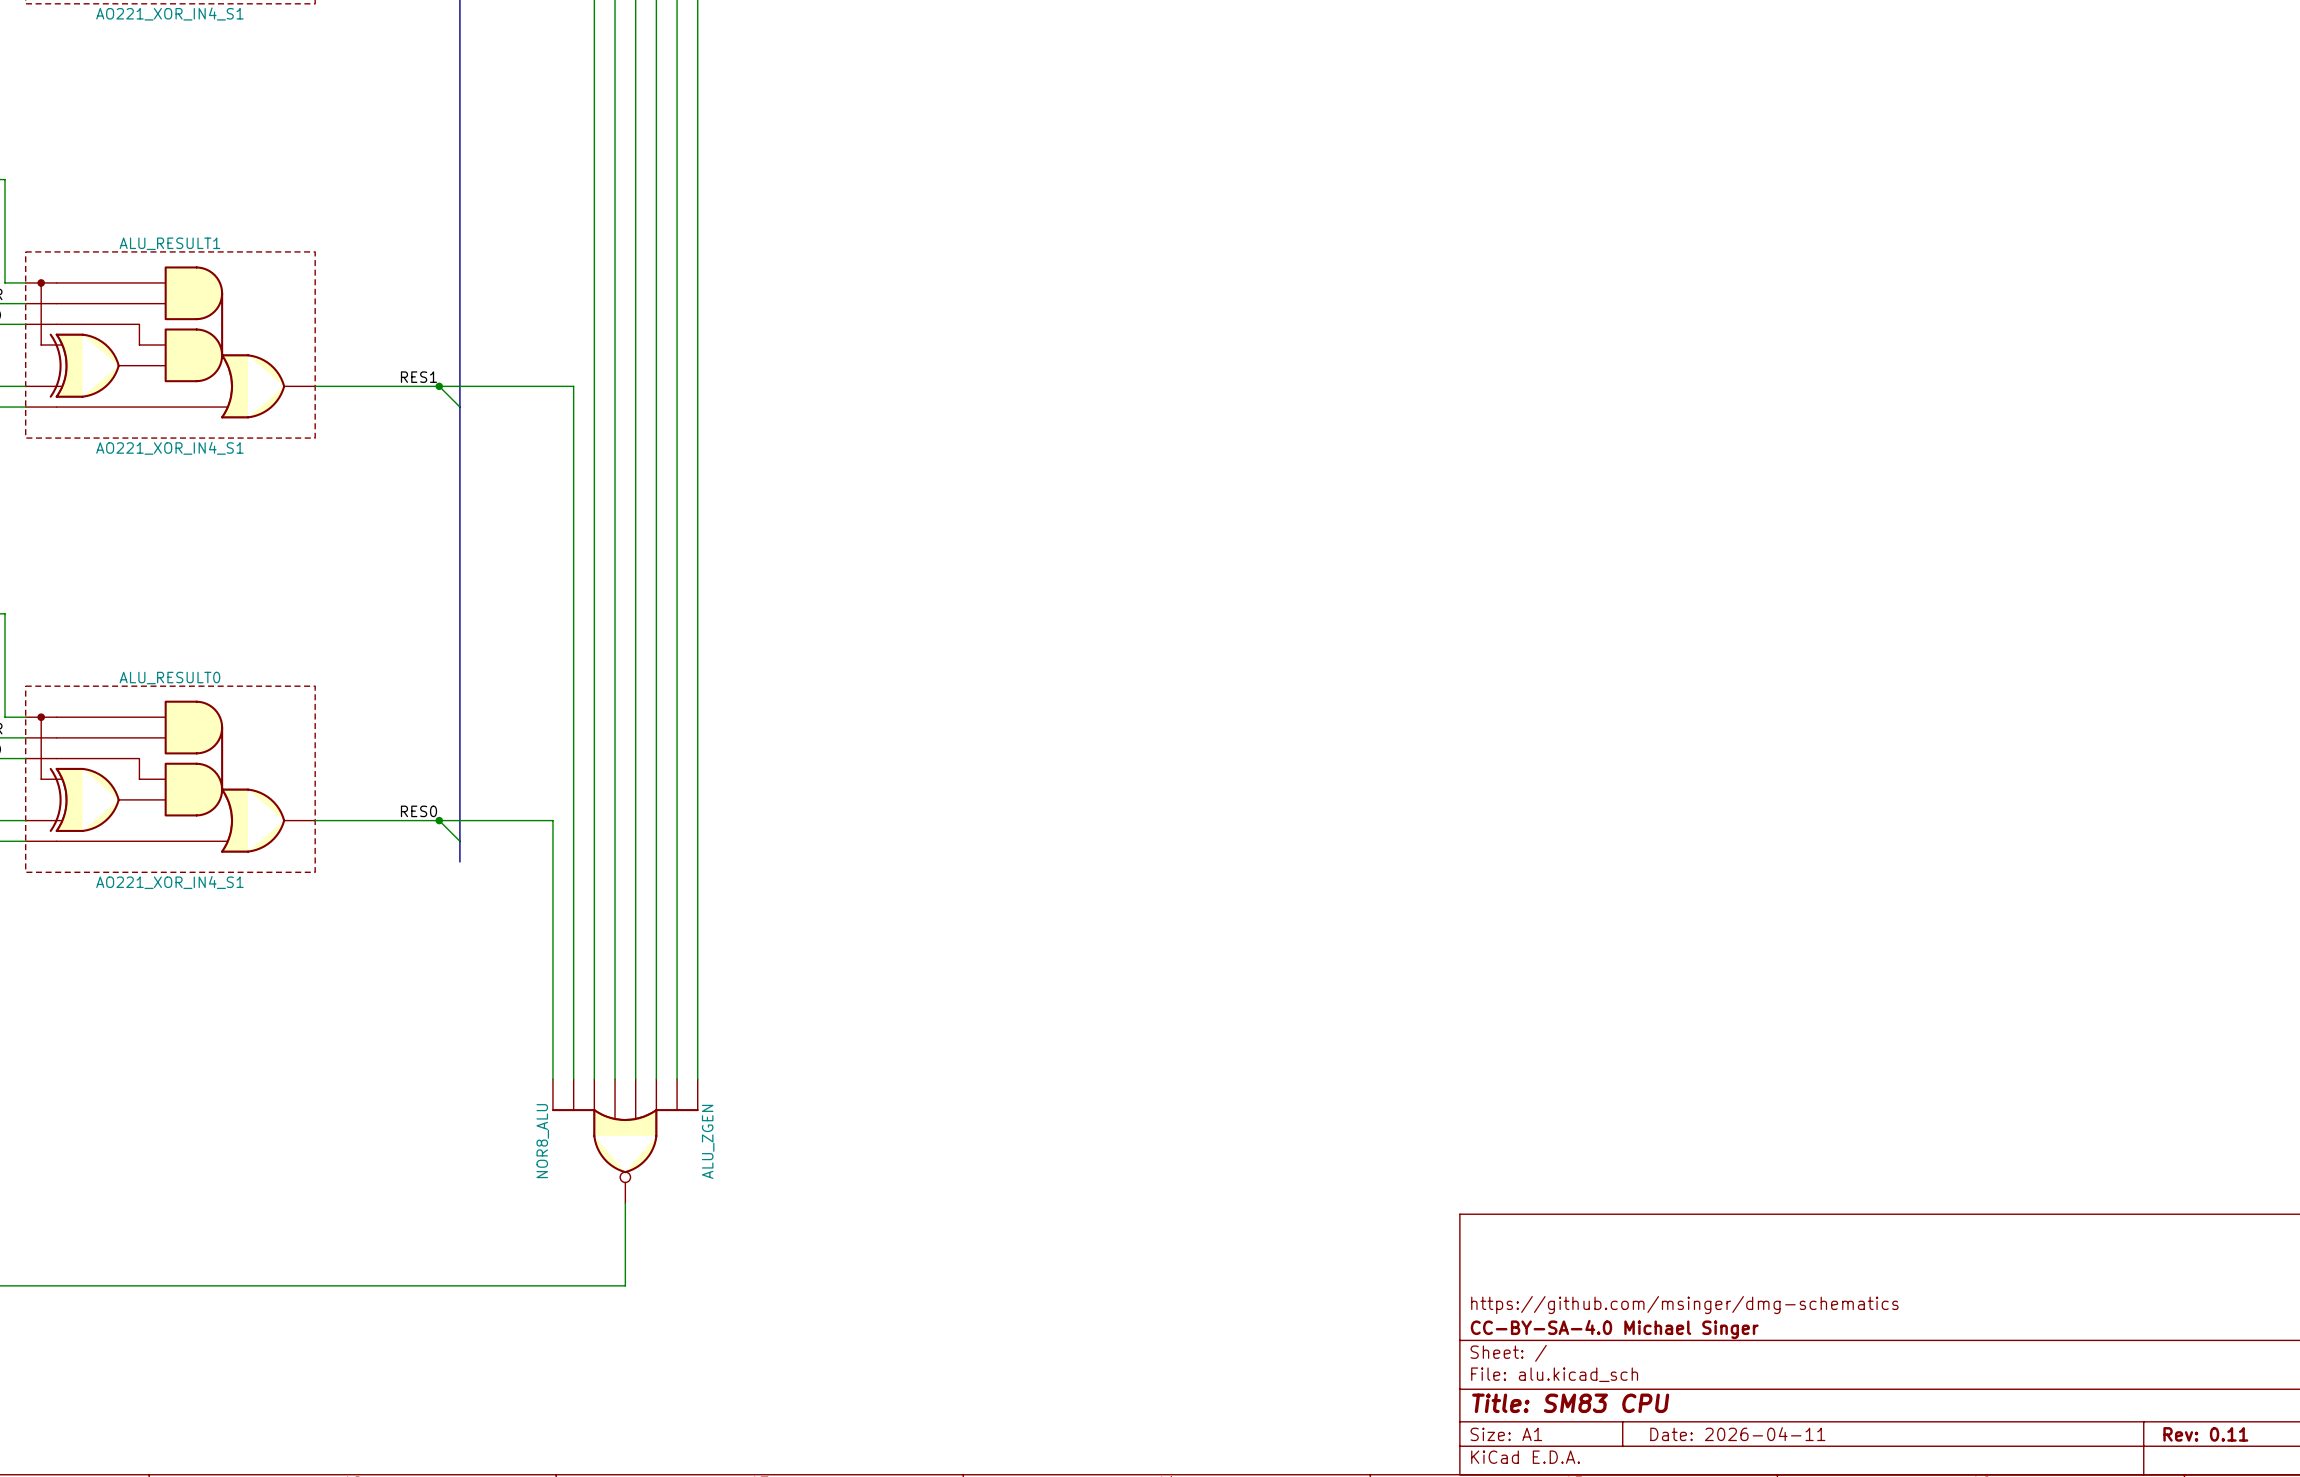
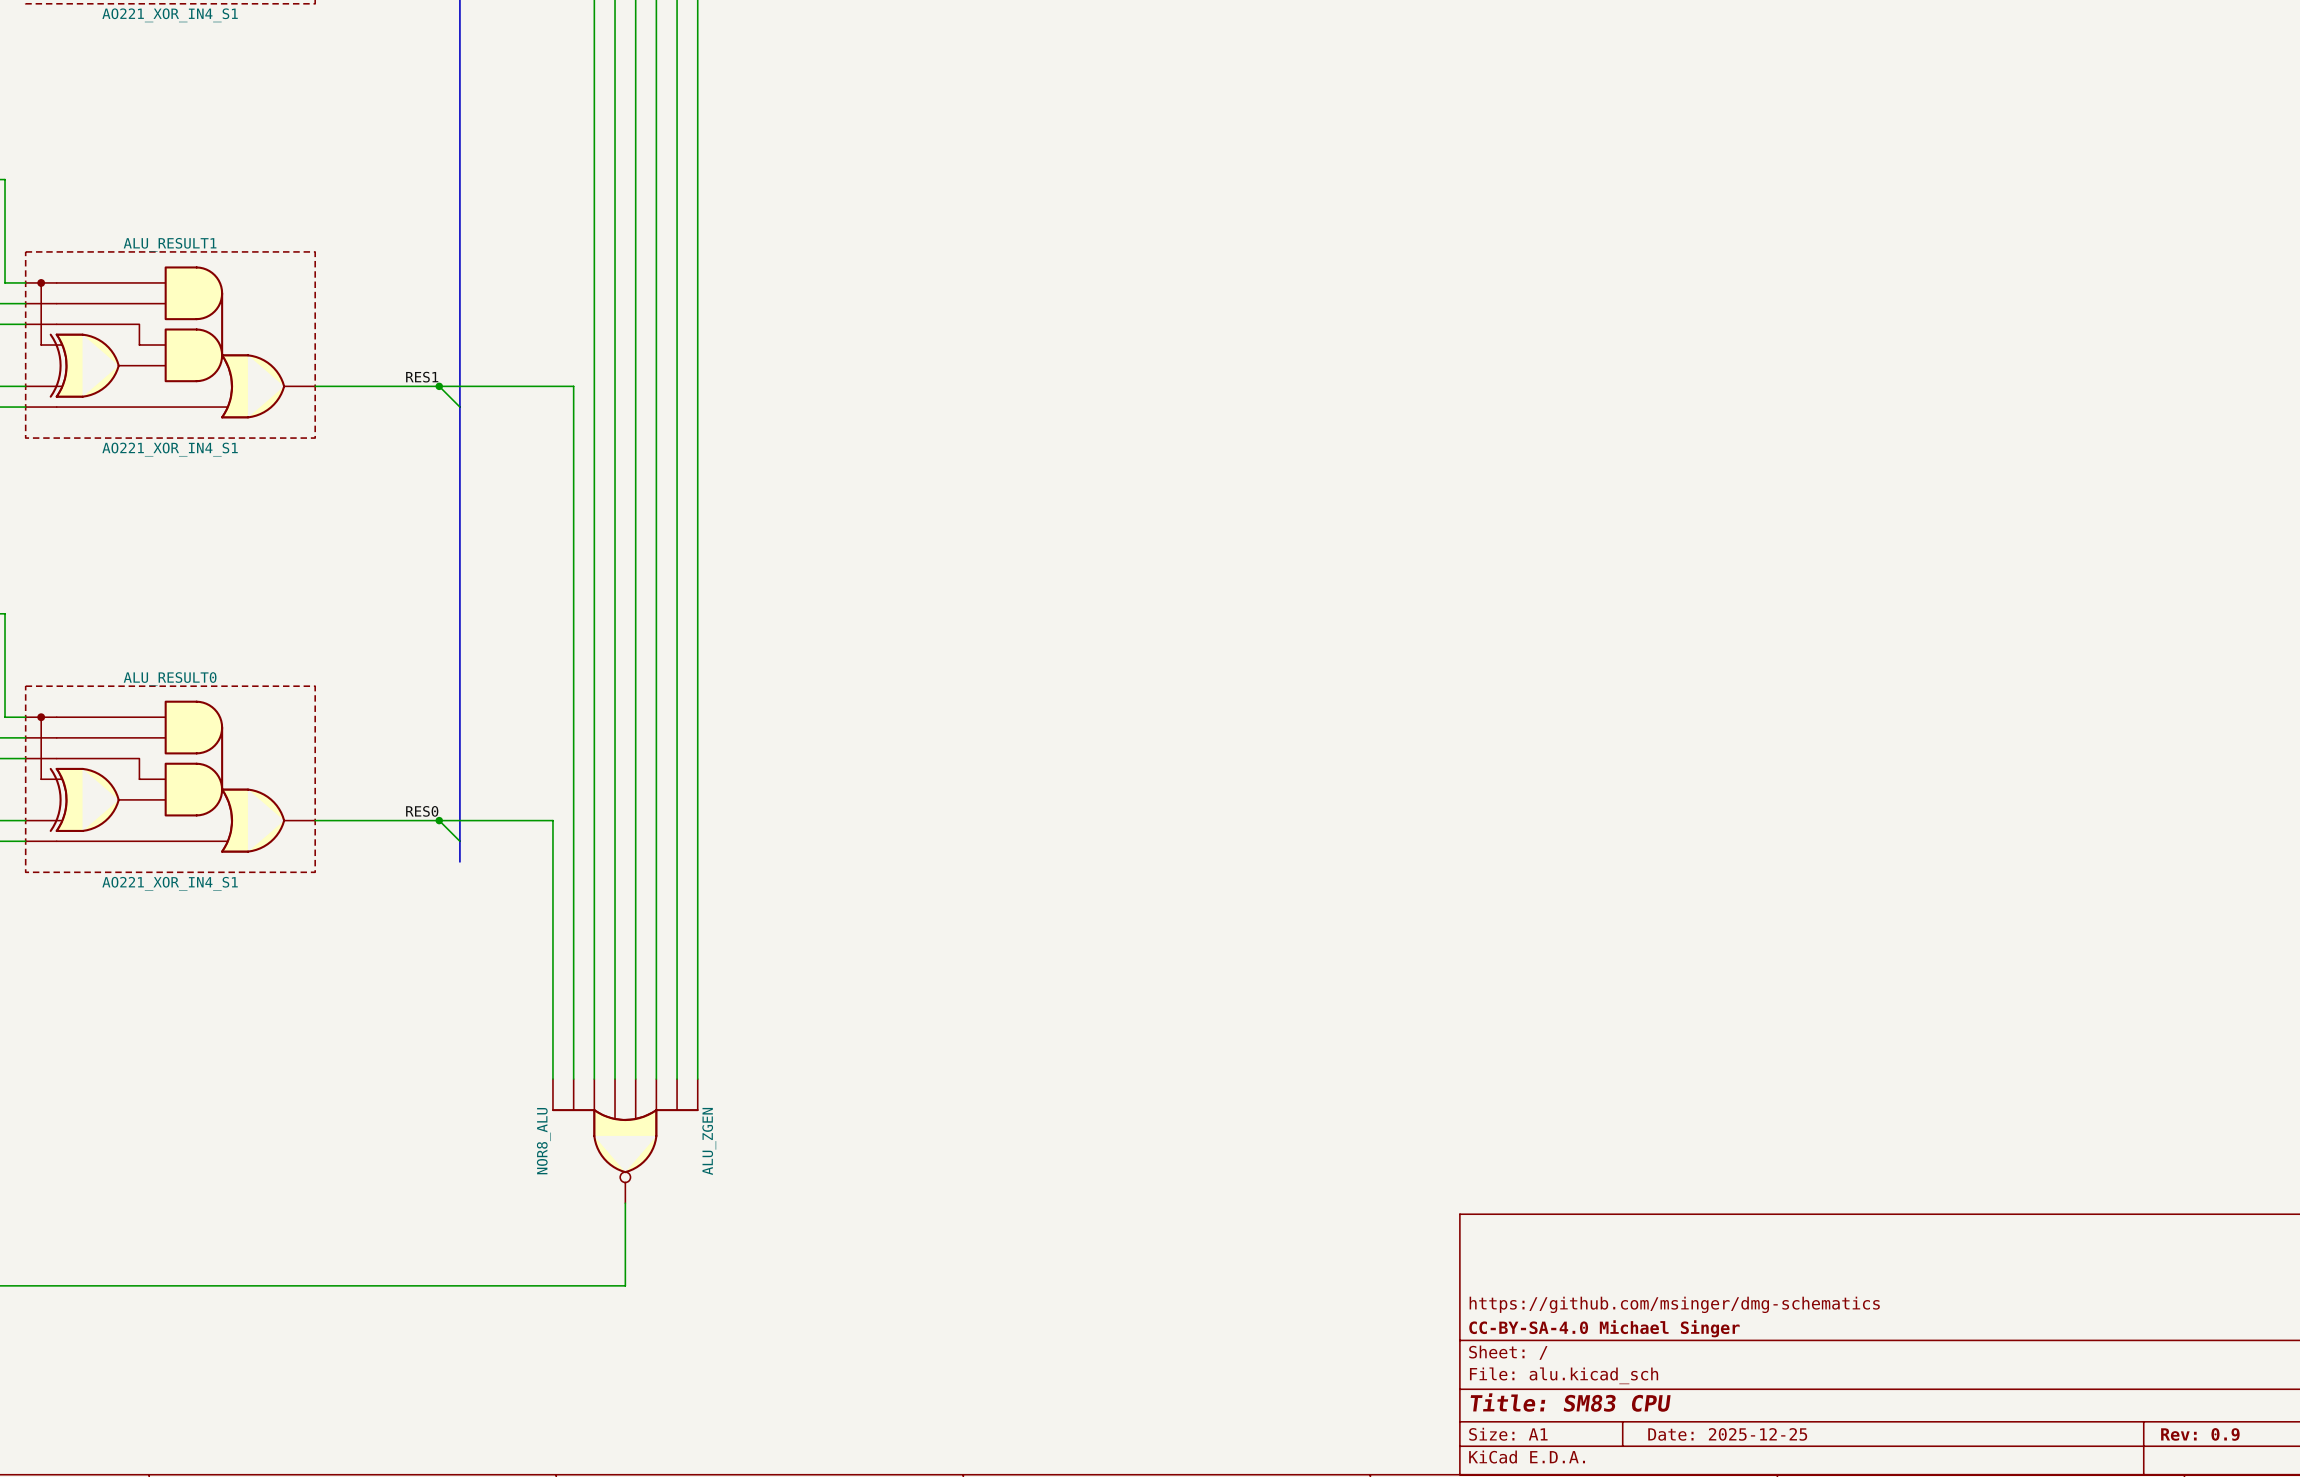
title block: Date: 2026-04-11 (1737, 1434) -> Date: 2025-12-25 (1727, 1434)
title block: Rev: 0.11 (2205, 1434) -> Rev: 0.9 (2200, 1434)

